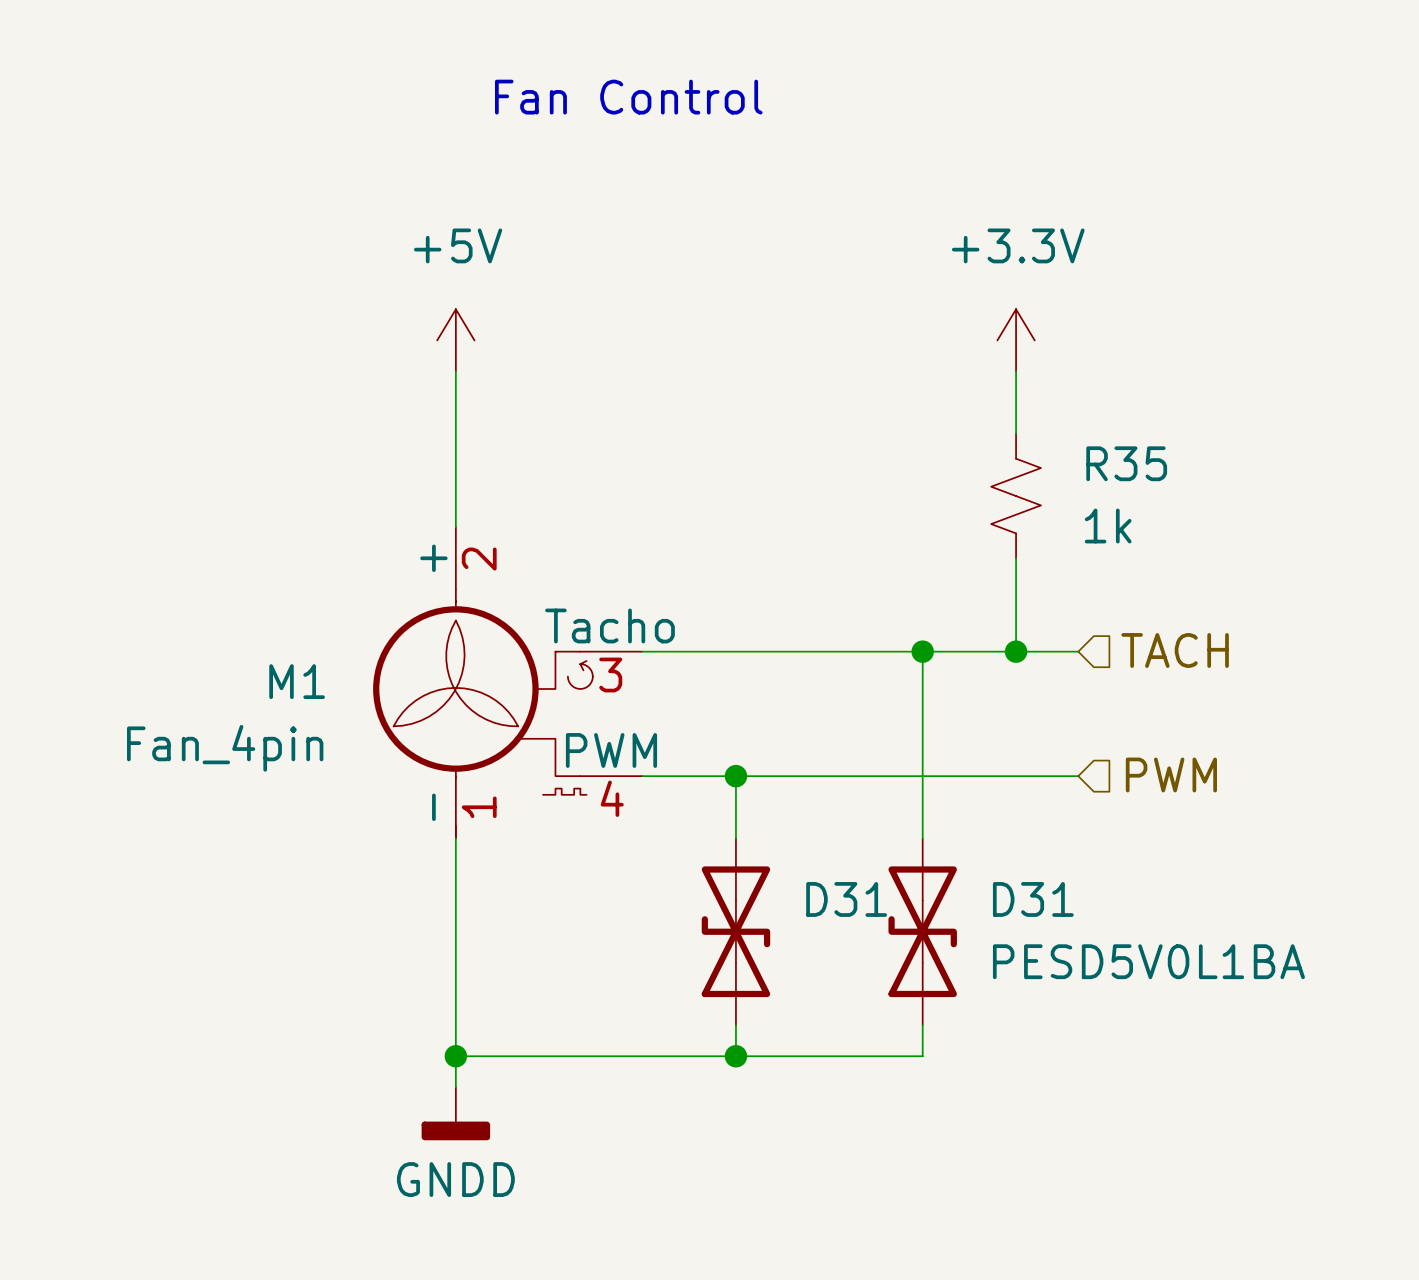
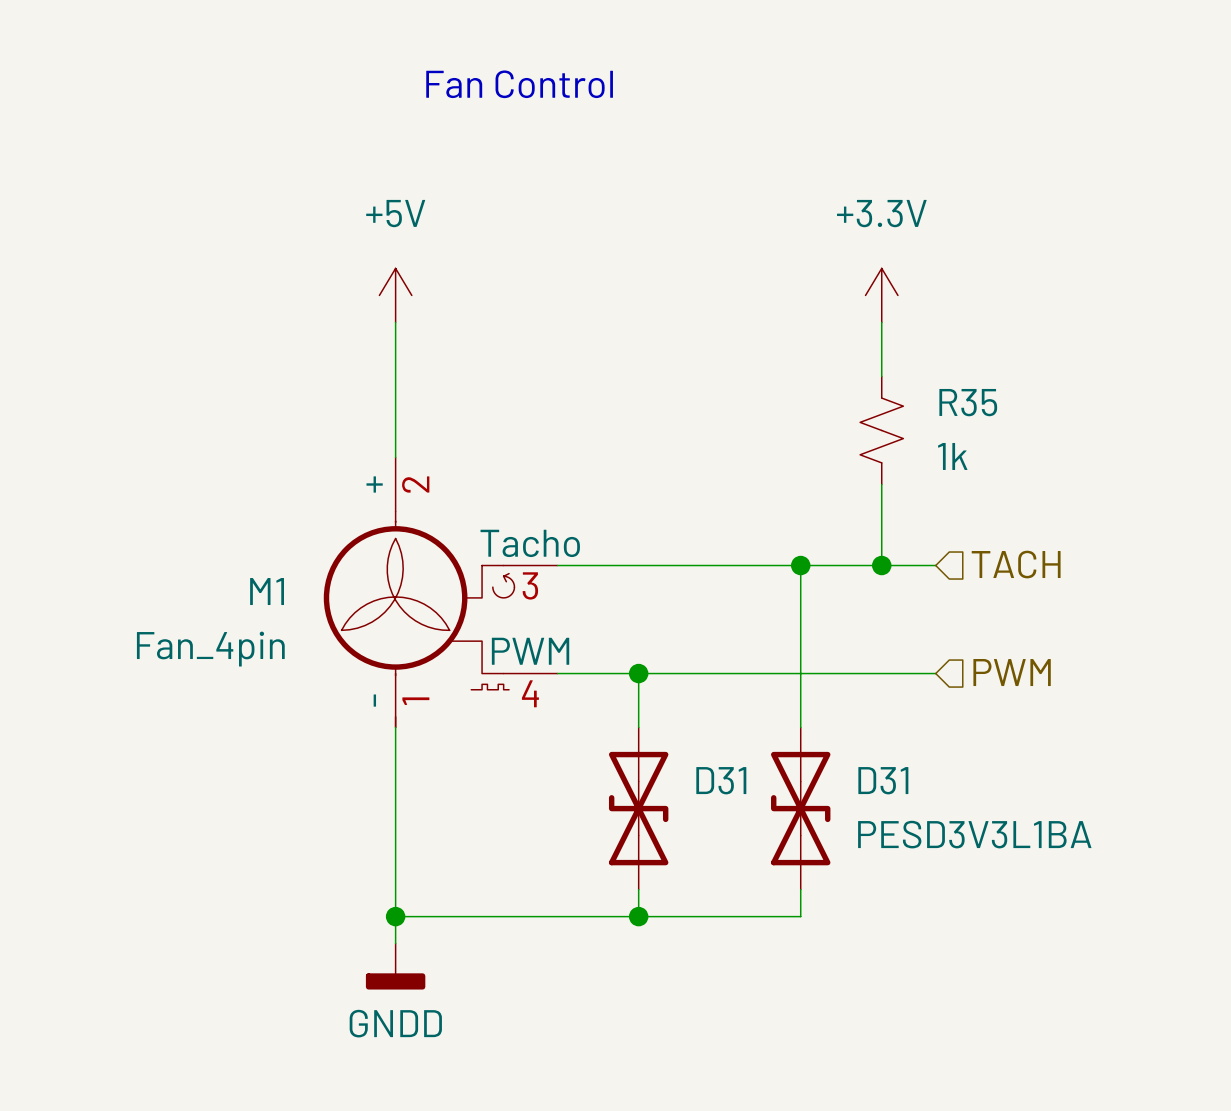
D31 value: PESD5V0L1BA (1148, 961) -> PESD3V3L1BA (974, 834)

